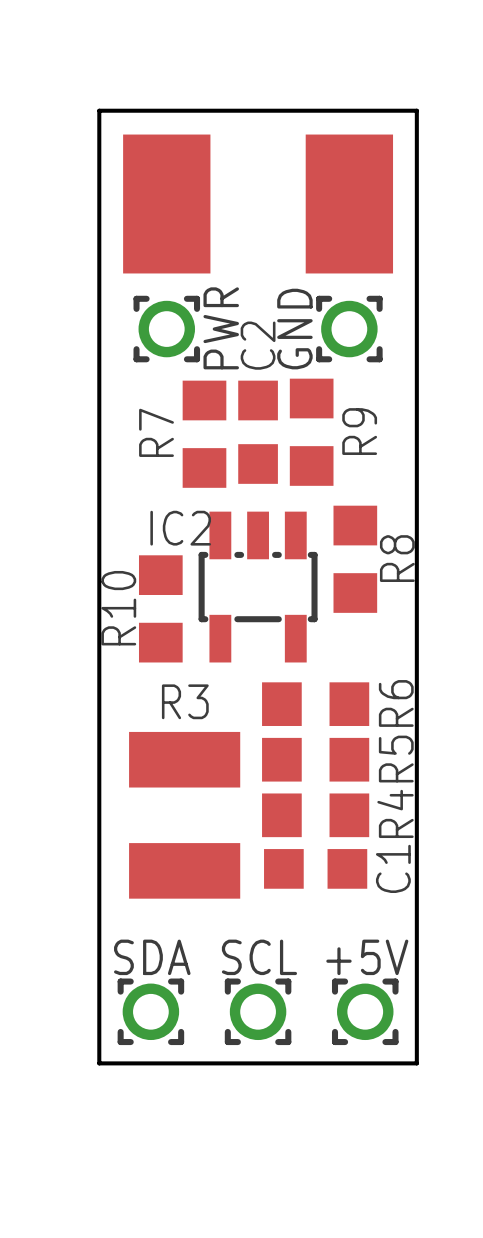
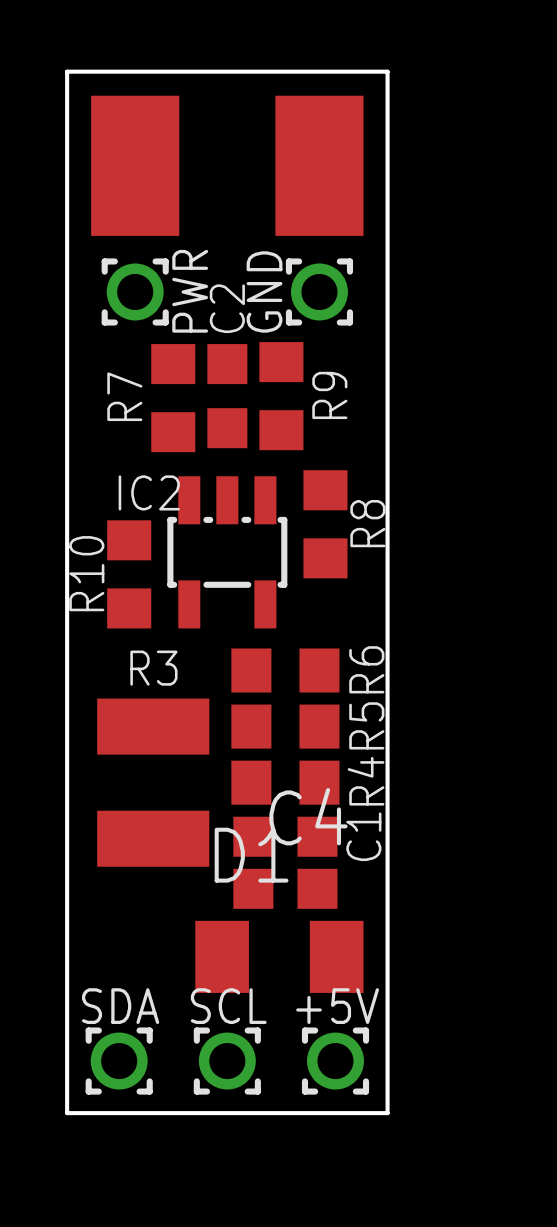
C4: none -> (285, 888)
D1: none -> (279, 956)
SDA position: (150, 1011) -> (119, 1061)
SCL position: (258, 1011) -> (227, 1061)
+5V position: (365, 1011) -> (335, 1061)
board edge: (99, 1063) (416, 1063) -> (67, 1033) (67, 1113) (387, 1113) (387, 1033)

